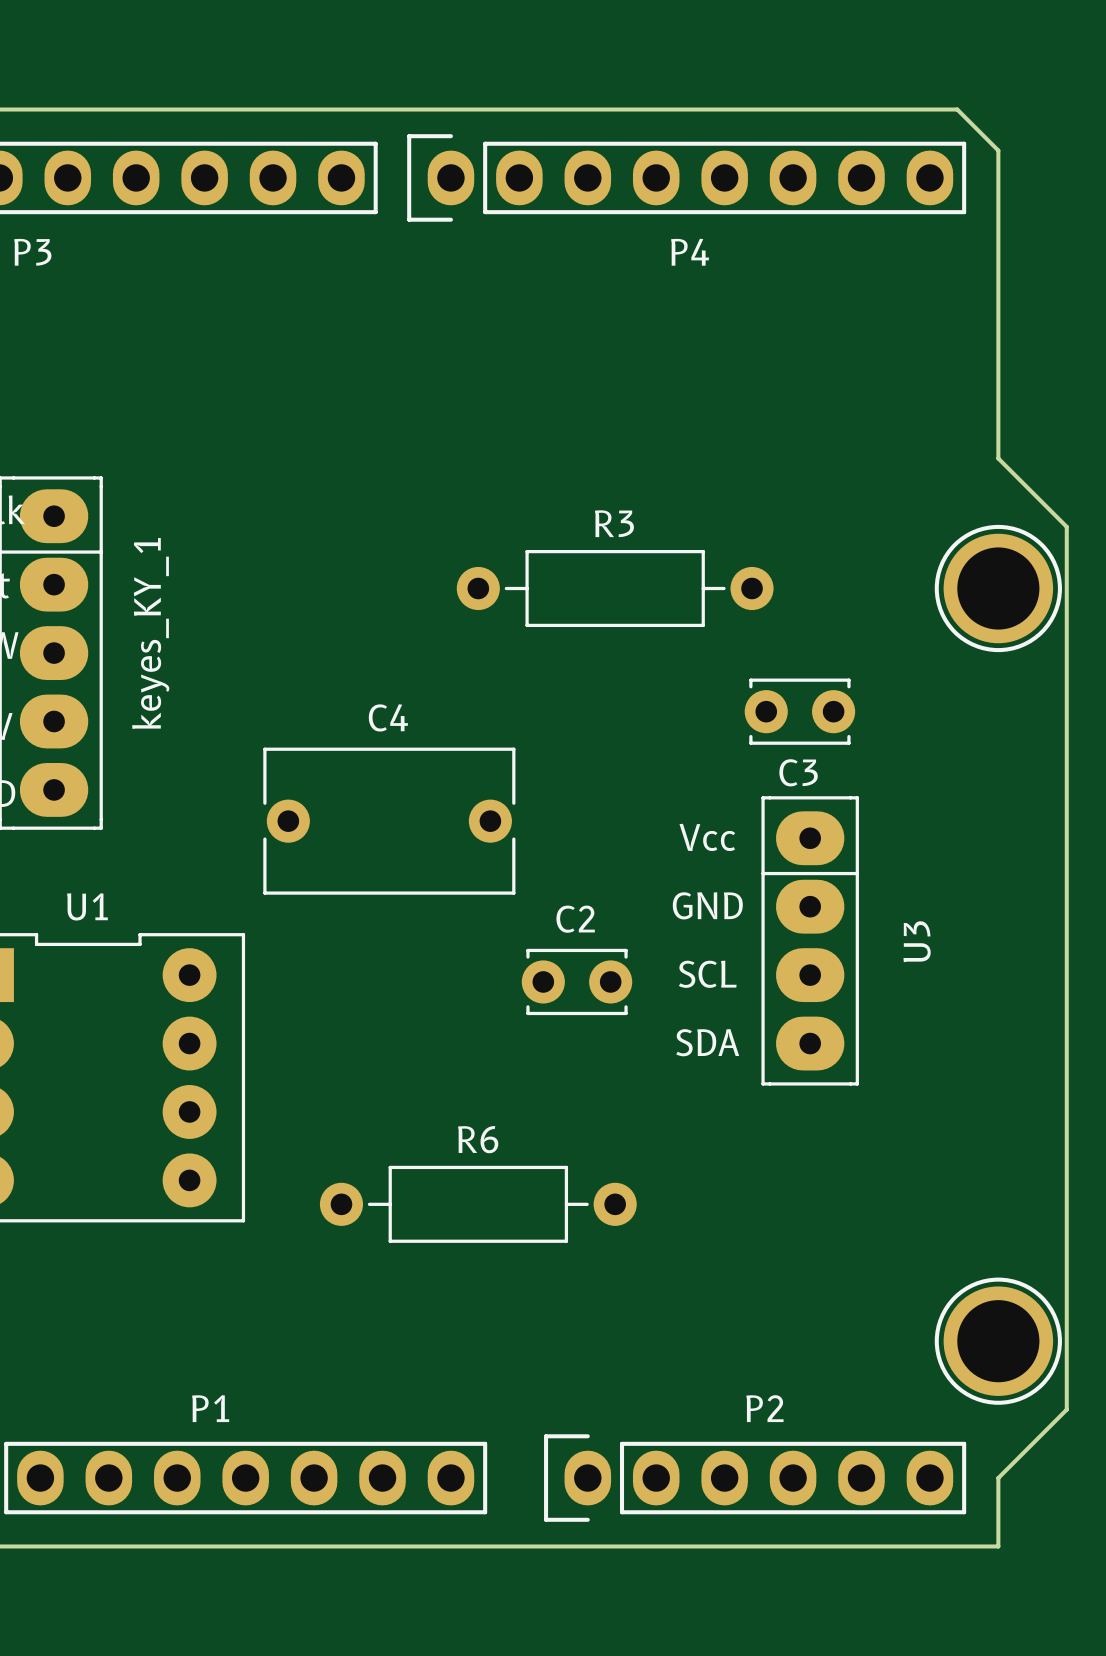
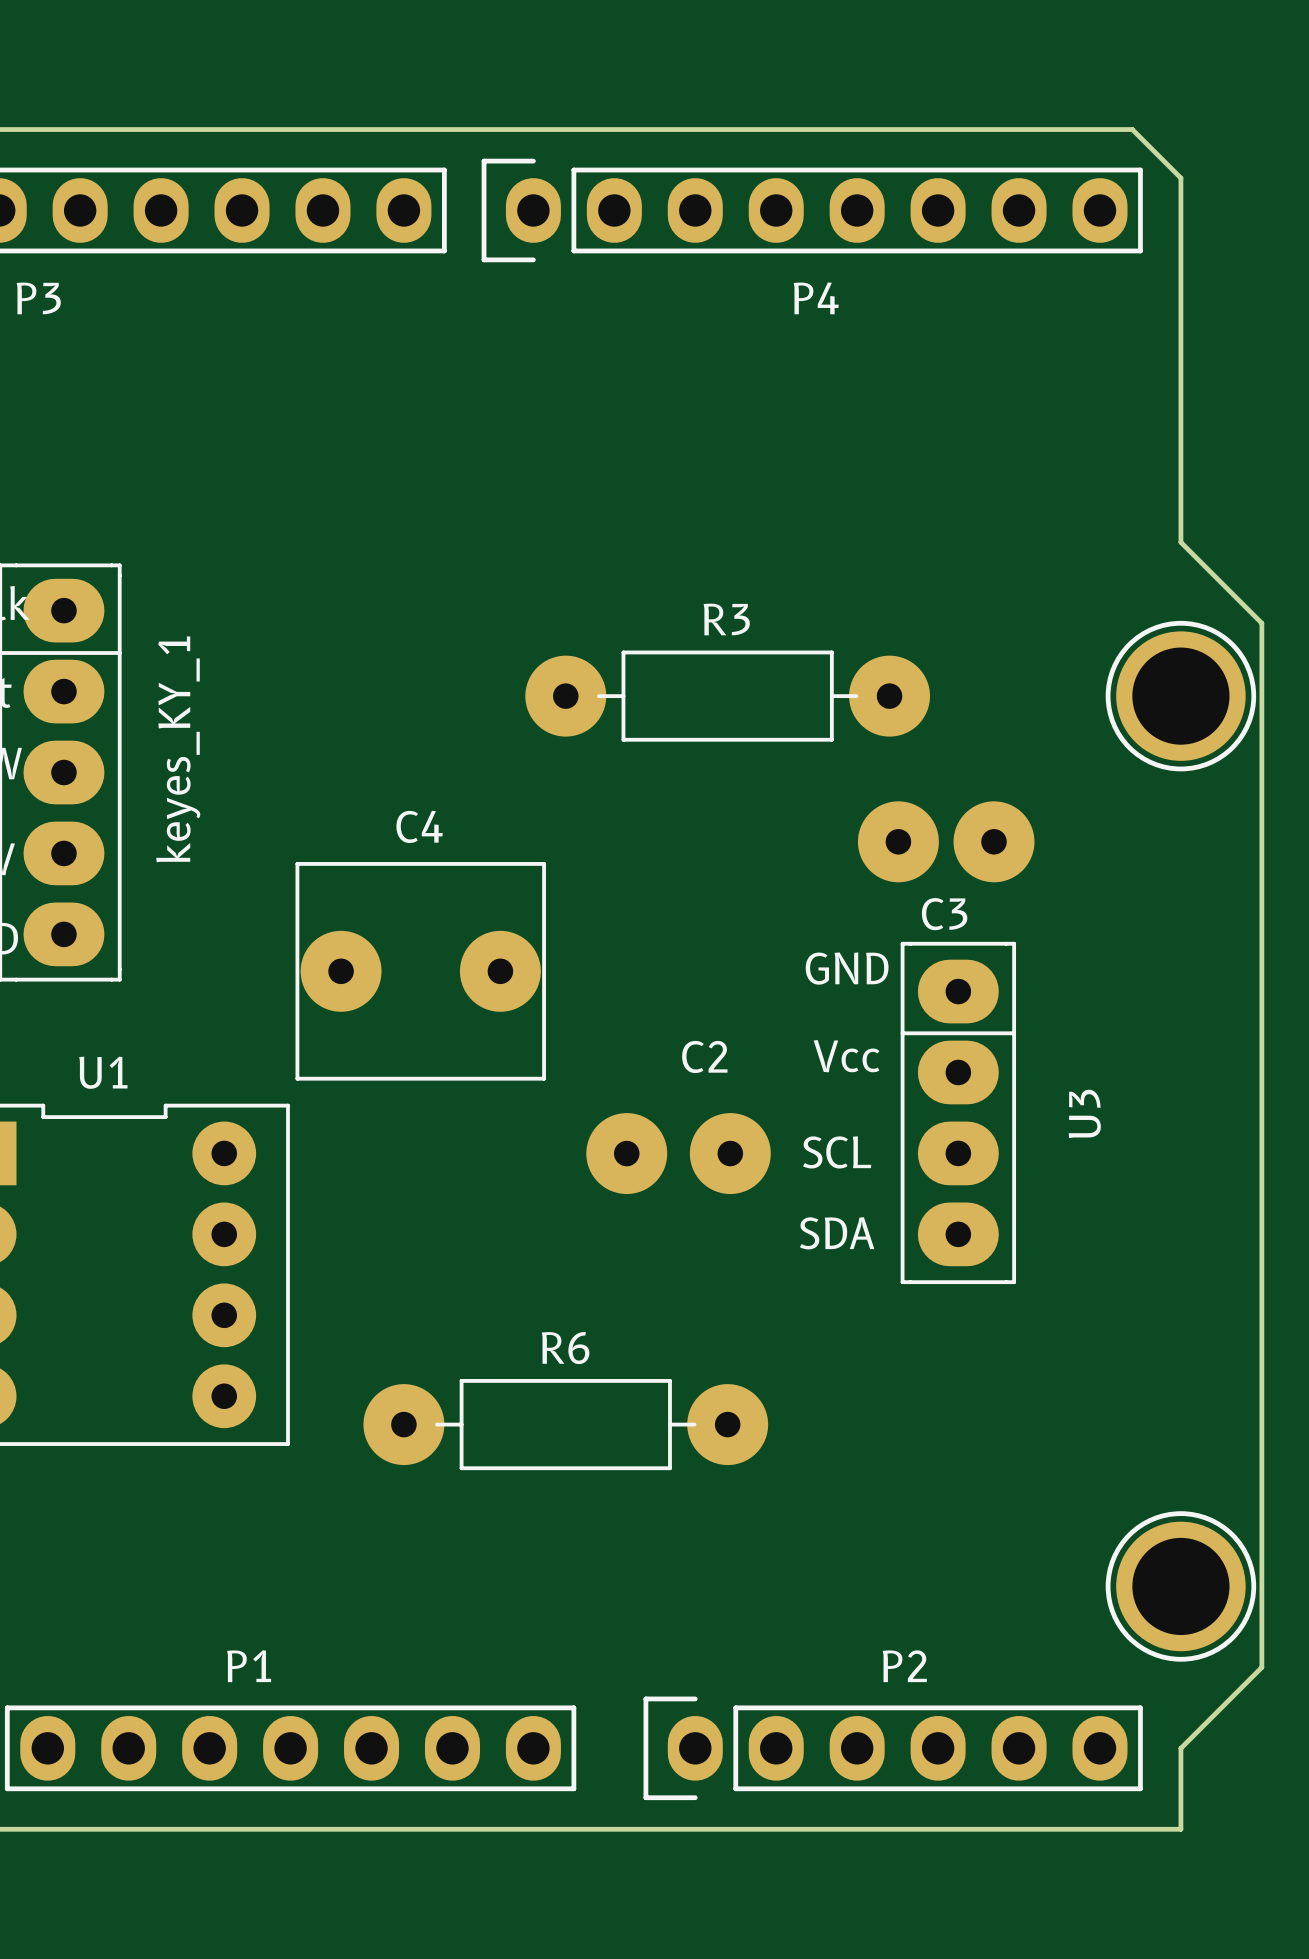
R3 footprint: [456, 549, 774, 628] -> [525, 650, 931, 742]
C3 footprint: [744, 678, 856, 745] -> [857, 801, 1035, 883]
C4 footprint: [263, 747, 516, 895] -> [295, 862, 546, 1081]
U3 text position: Vcc (707, 837) -> Vcc (846, 1056)
U3 text position: GND (707, 905) -> GND (847, 968)
C2 footprint: [521, 948, 633, 1016] -> [586, 1113, 771, 1195]
R6 footprint: [319, 1165, 637, 1243] -> [363, 1379, 769, 1471]

